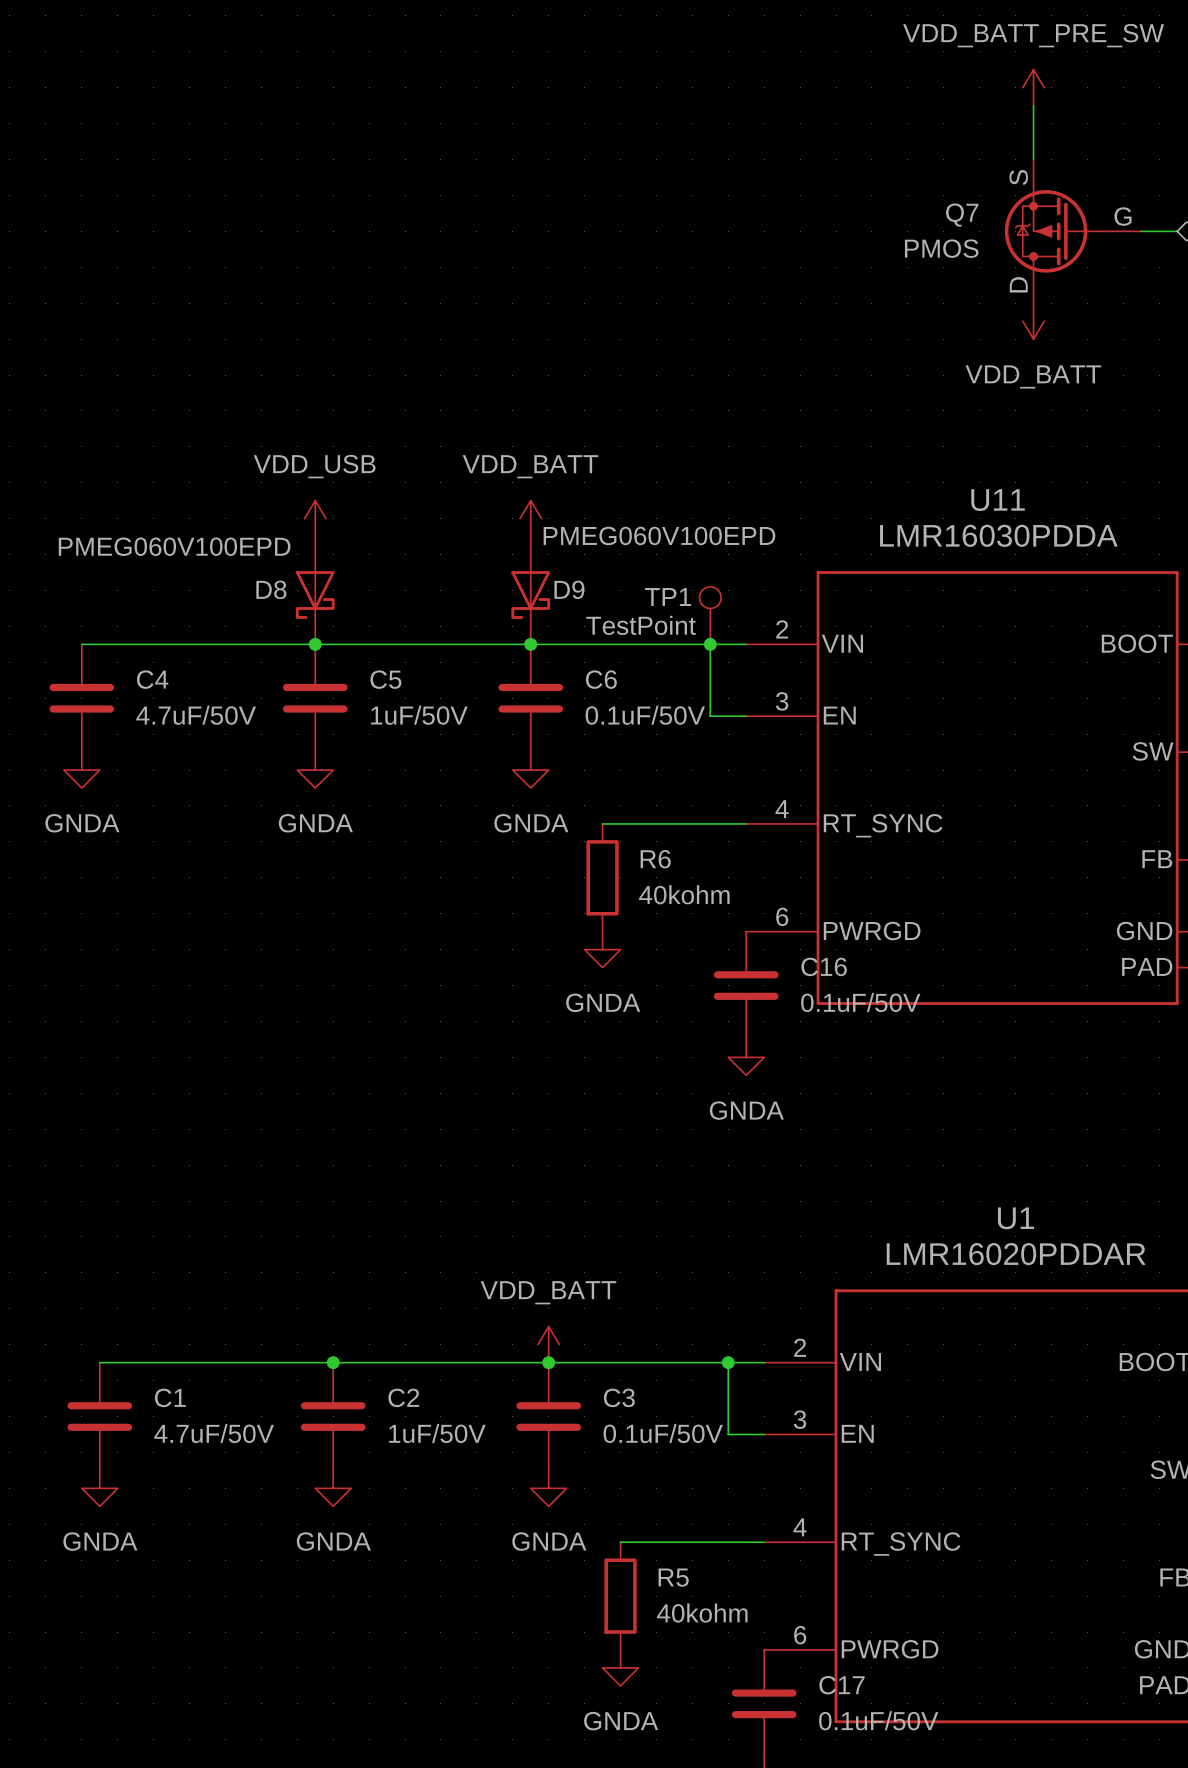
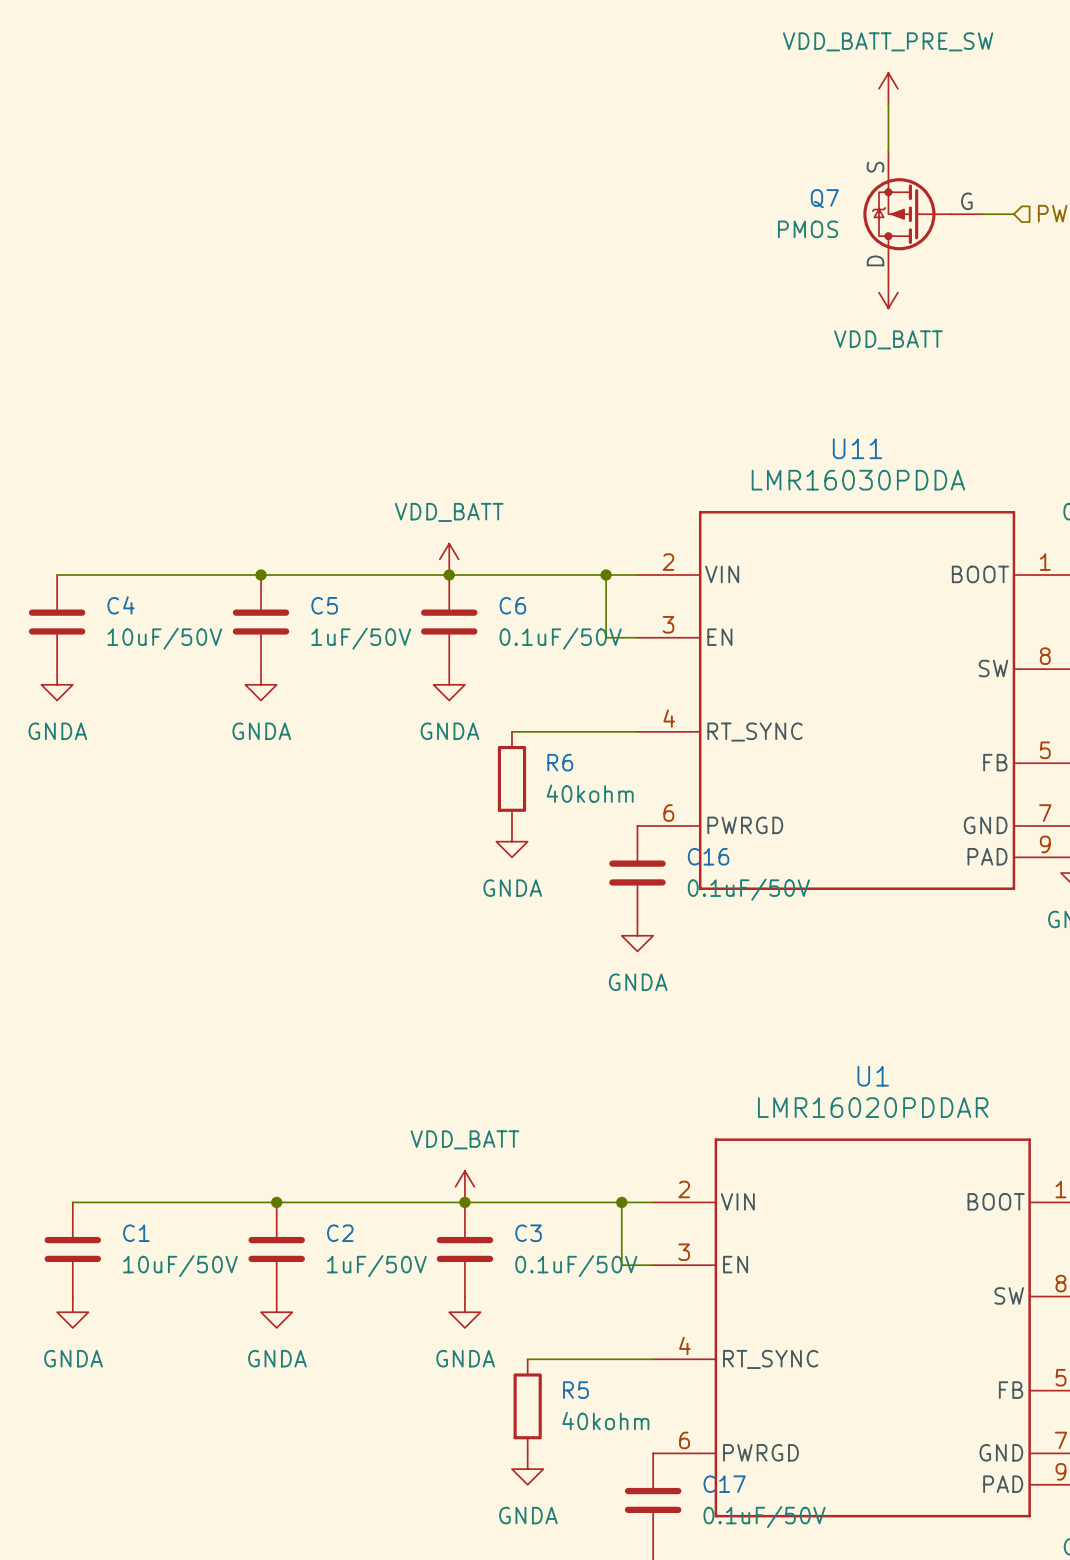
power symbol: VDD_USB (315, 518) -> none
power symbol position: VDD_BATT (530, 518) -> VDD_BATT (449, 559)
D8: PMEG060V100EPD (315, 590) -> none
D9: PMEG060V100EPD (530, 590) -> none
TP1: TestPoint (710, 615) -> none
C4 value: 4.7uF/50V (196, 715) -> 10uF/50V (164, 638)
C1 value: 4.7uF/50V (214, 1433) -> 10uF/50V (180, 1266)

